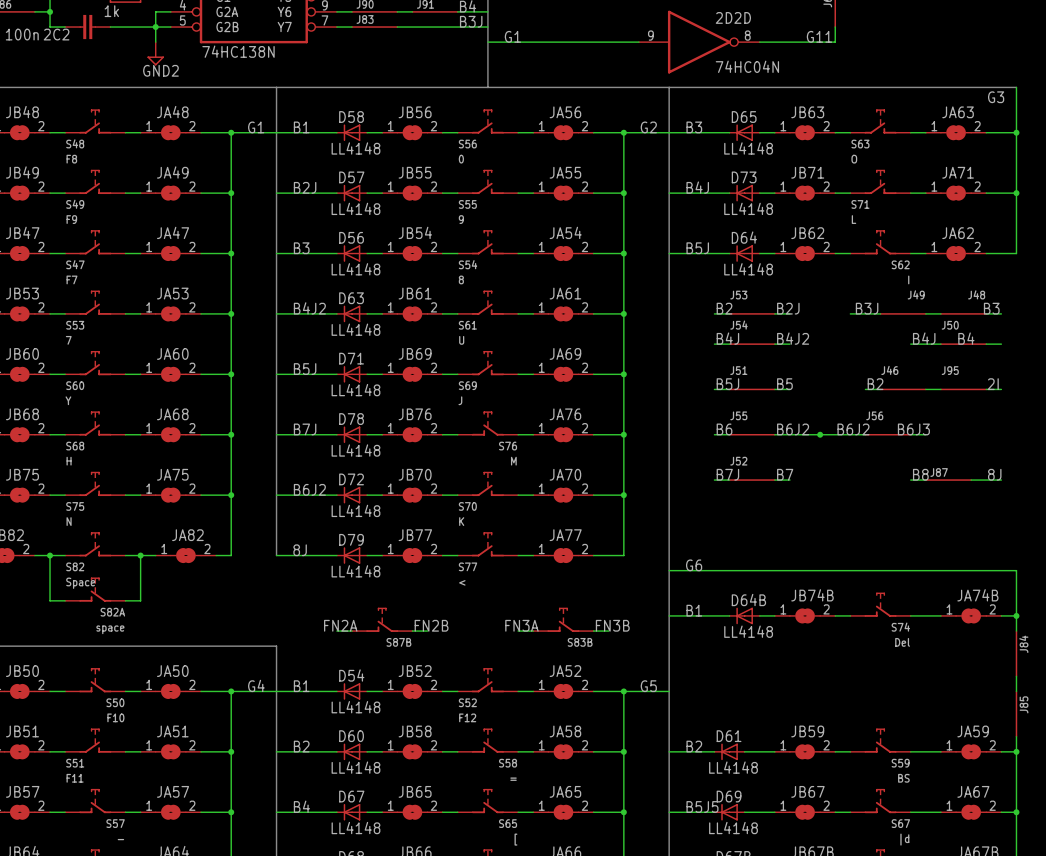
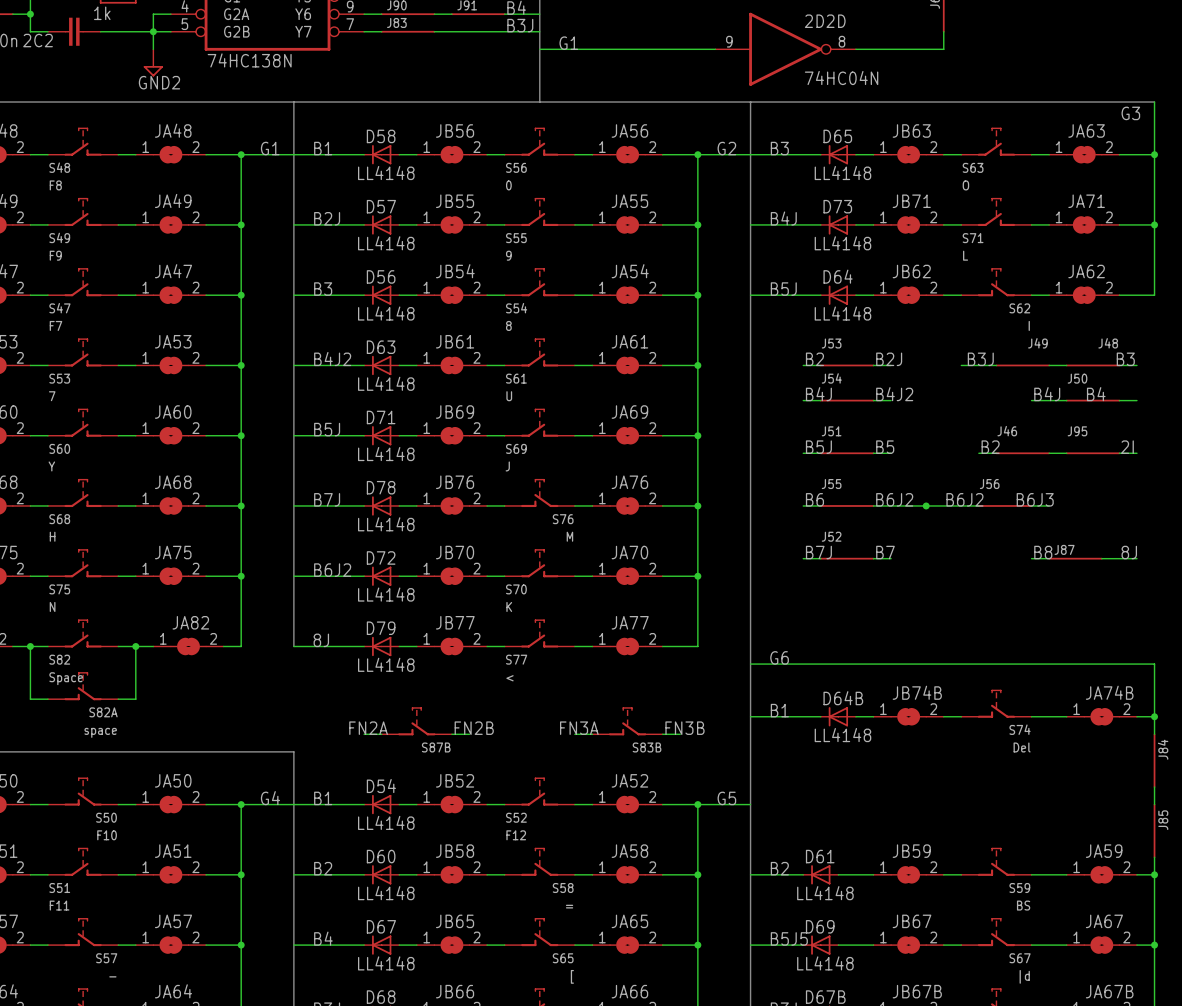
label: G11 (819, 36) -> none

